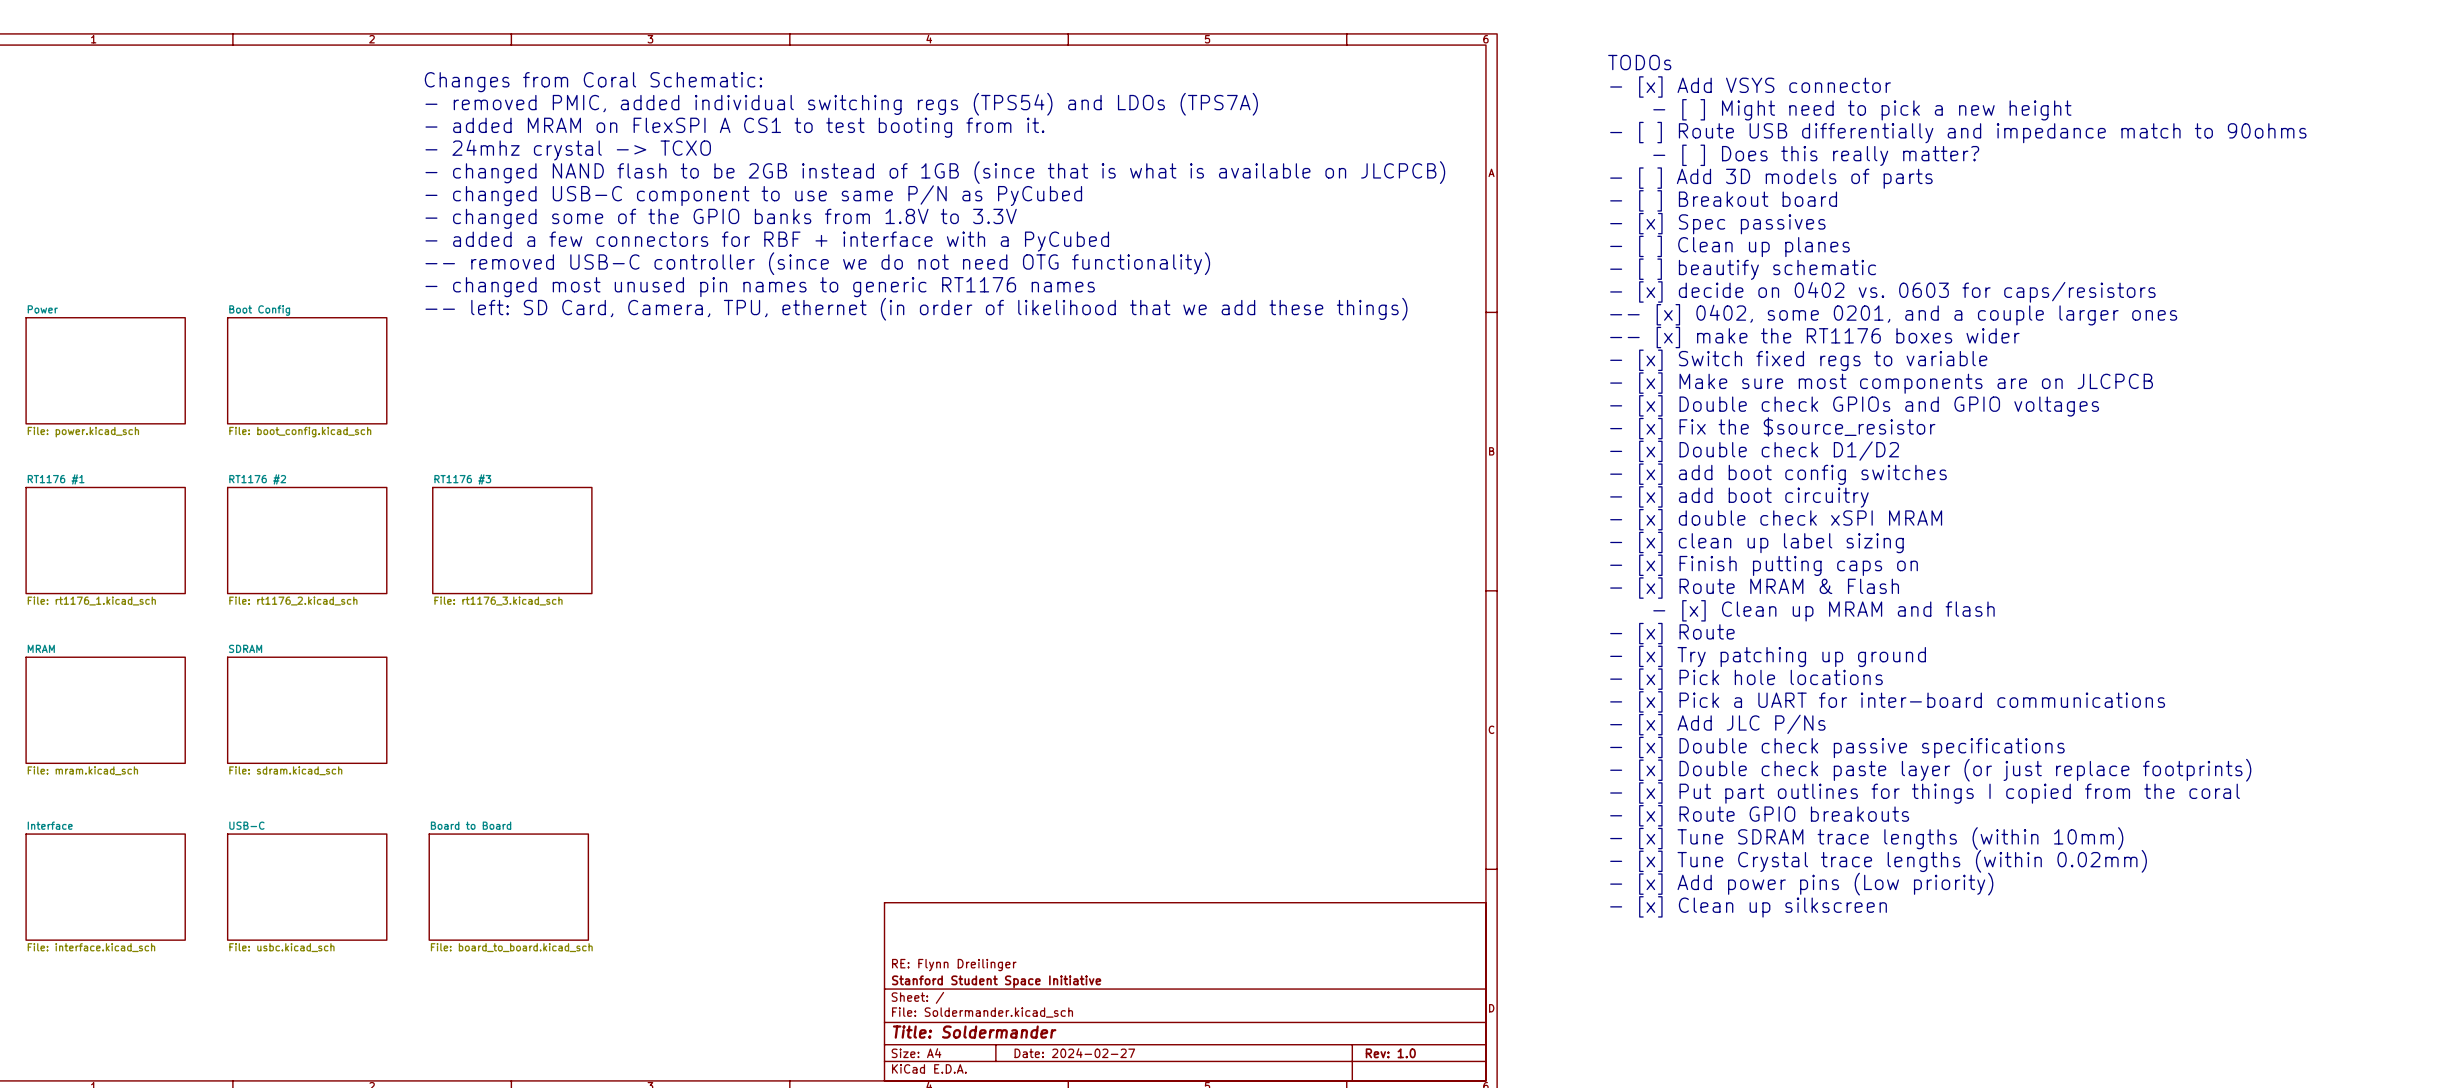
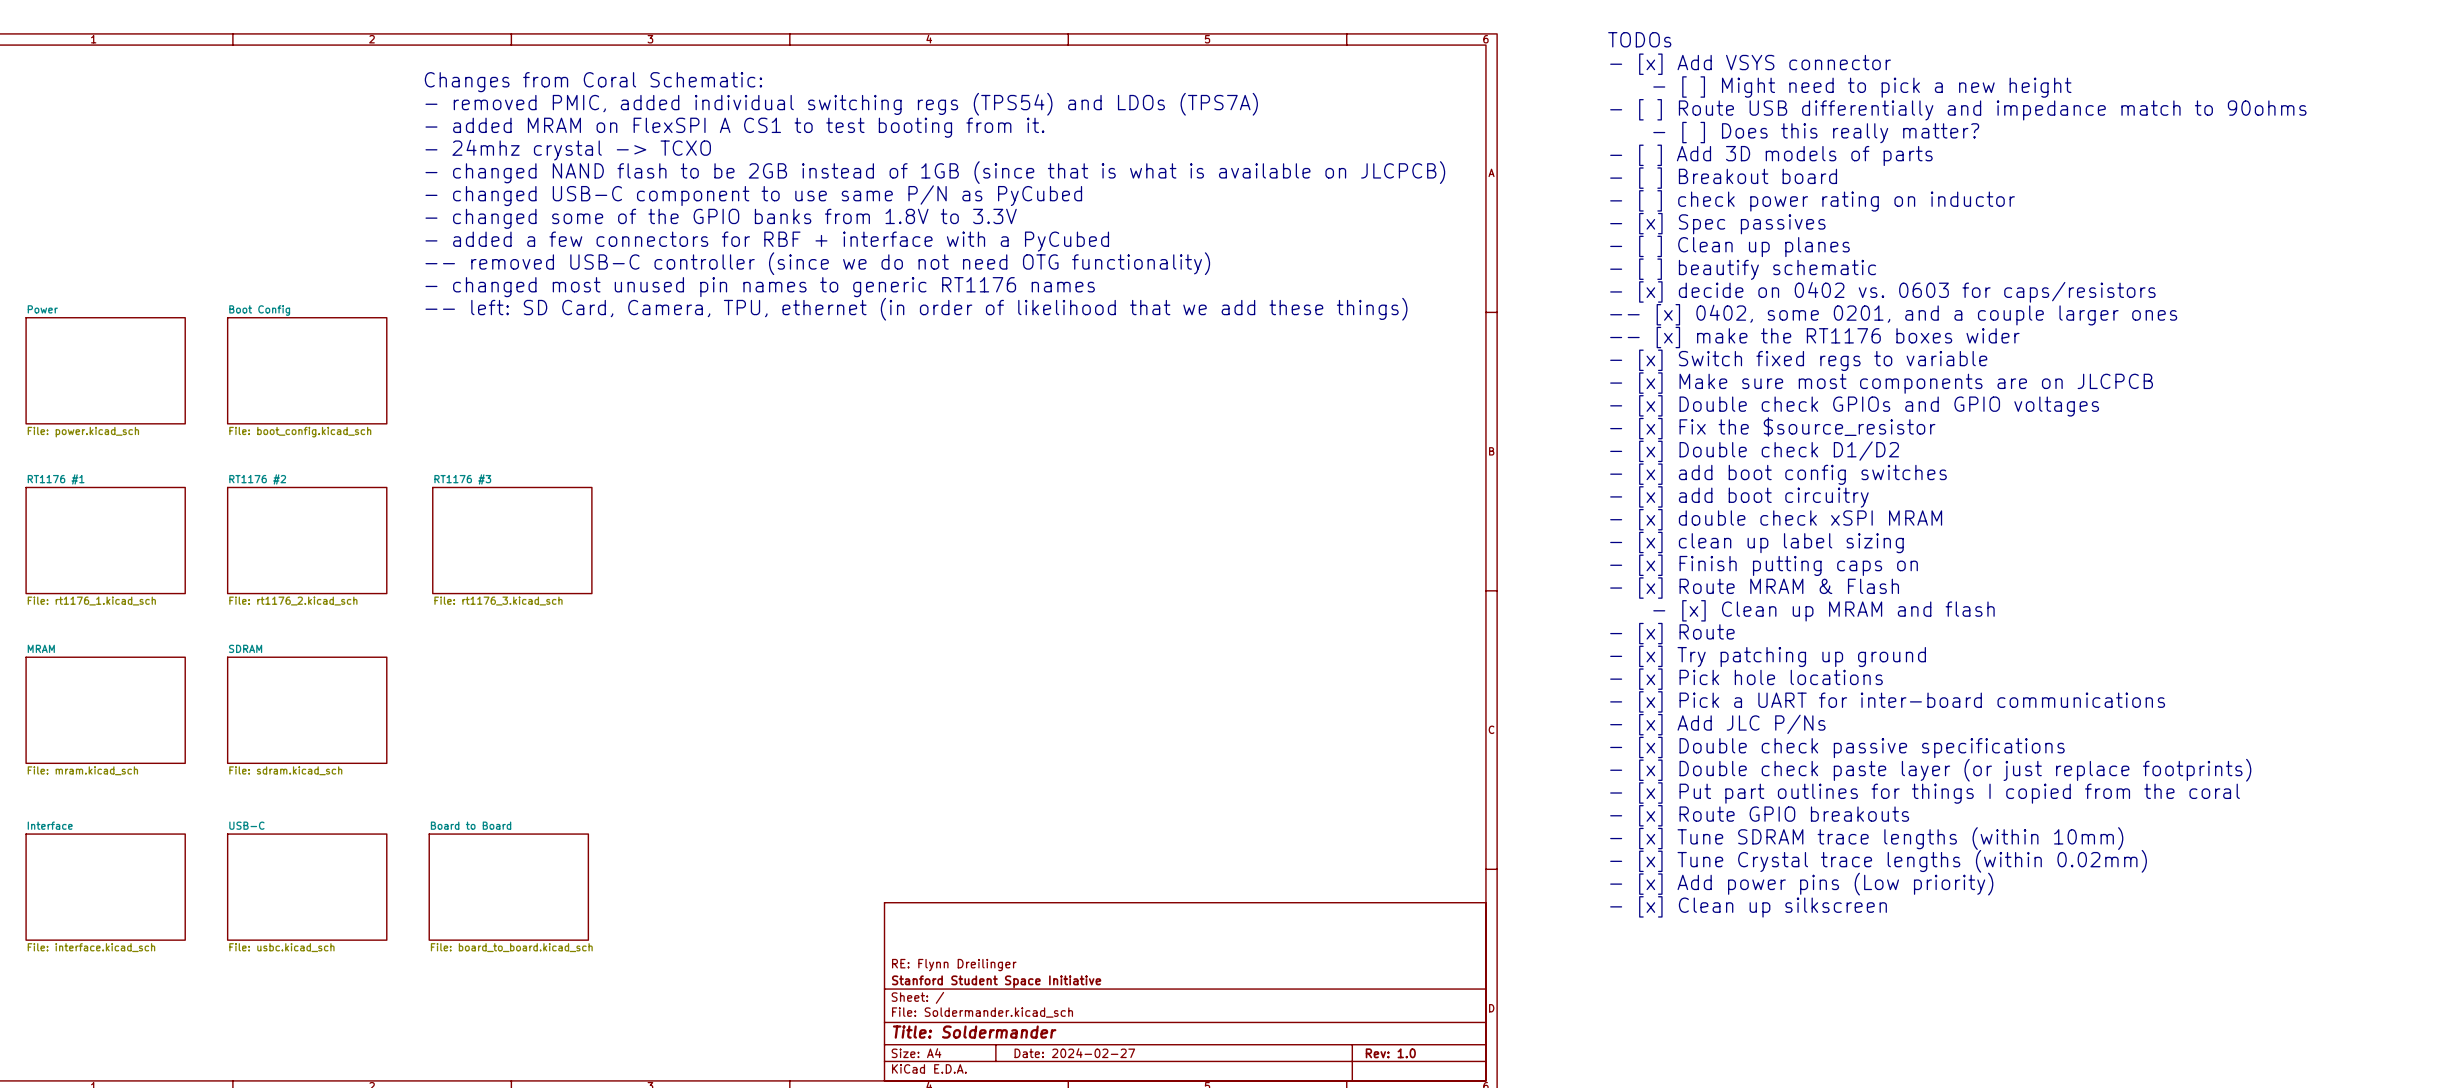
text: none -> TODOs (1639, 39)
text: TODOs (1639, 62) -> - [x] Add VSYS connector (1750, 64)
text: - [x] Add VSYS connector (1750, 86) -> - [ ] Might need to pick a new height (1862, 86)
text: - [ ] Might need to pick a new height (1862, 109) -> - [ ] Route USB differentially and impedance match to 90ohms (1958, 109)
text: - [ ] Route USB differentially and impedance match to 90ohms (1958, 132) -> - [ ] Does this really matter? (1816, 132)
text: - [ ] Does this really matter? (1816, 155) -> - [ ] Add 3D models of parts (1771, 155)
text: - [ ] Add 3D models of parts (1771, 178) -> - [ ] Breakout board (1723, 178)
text: - [ ] Breakout board (1723, 200) -> - [ ] check power rating on inductor (1812, 200)

